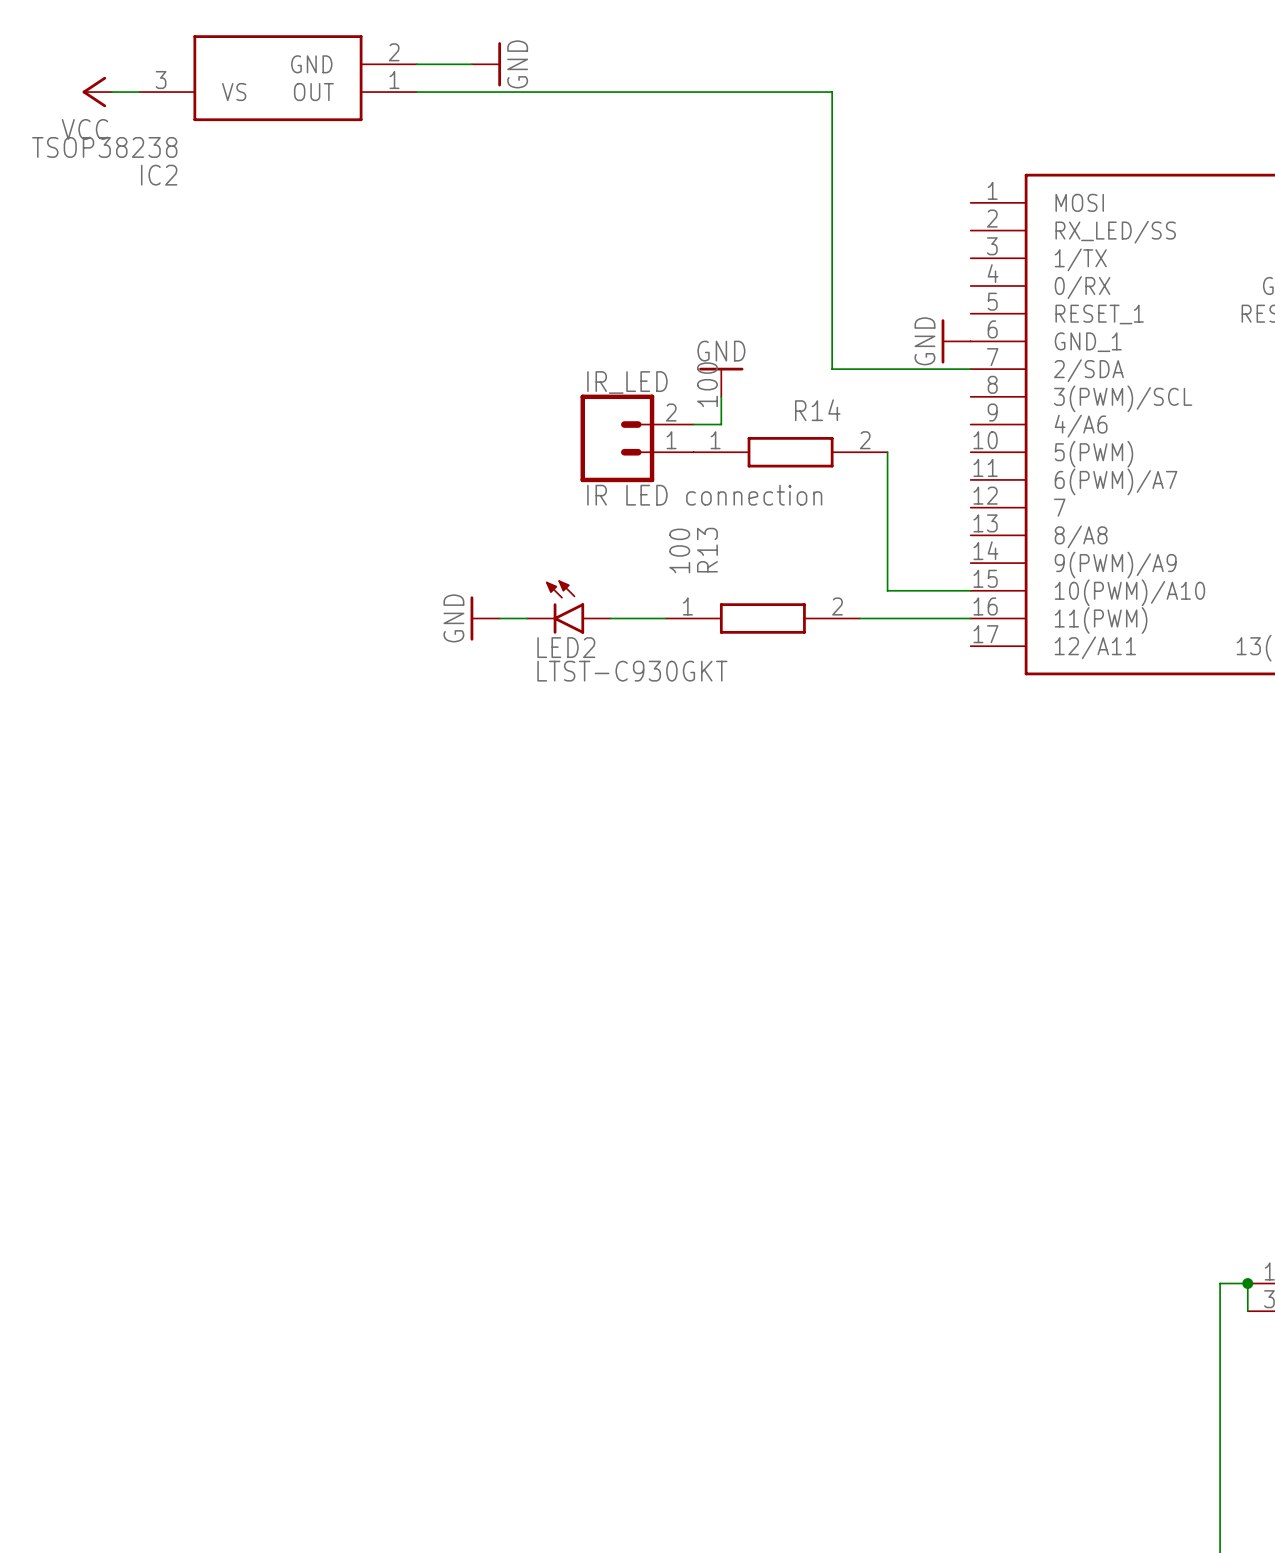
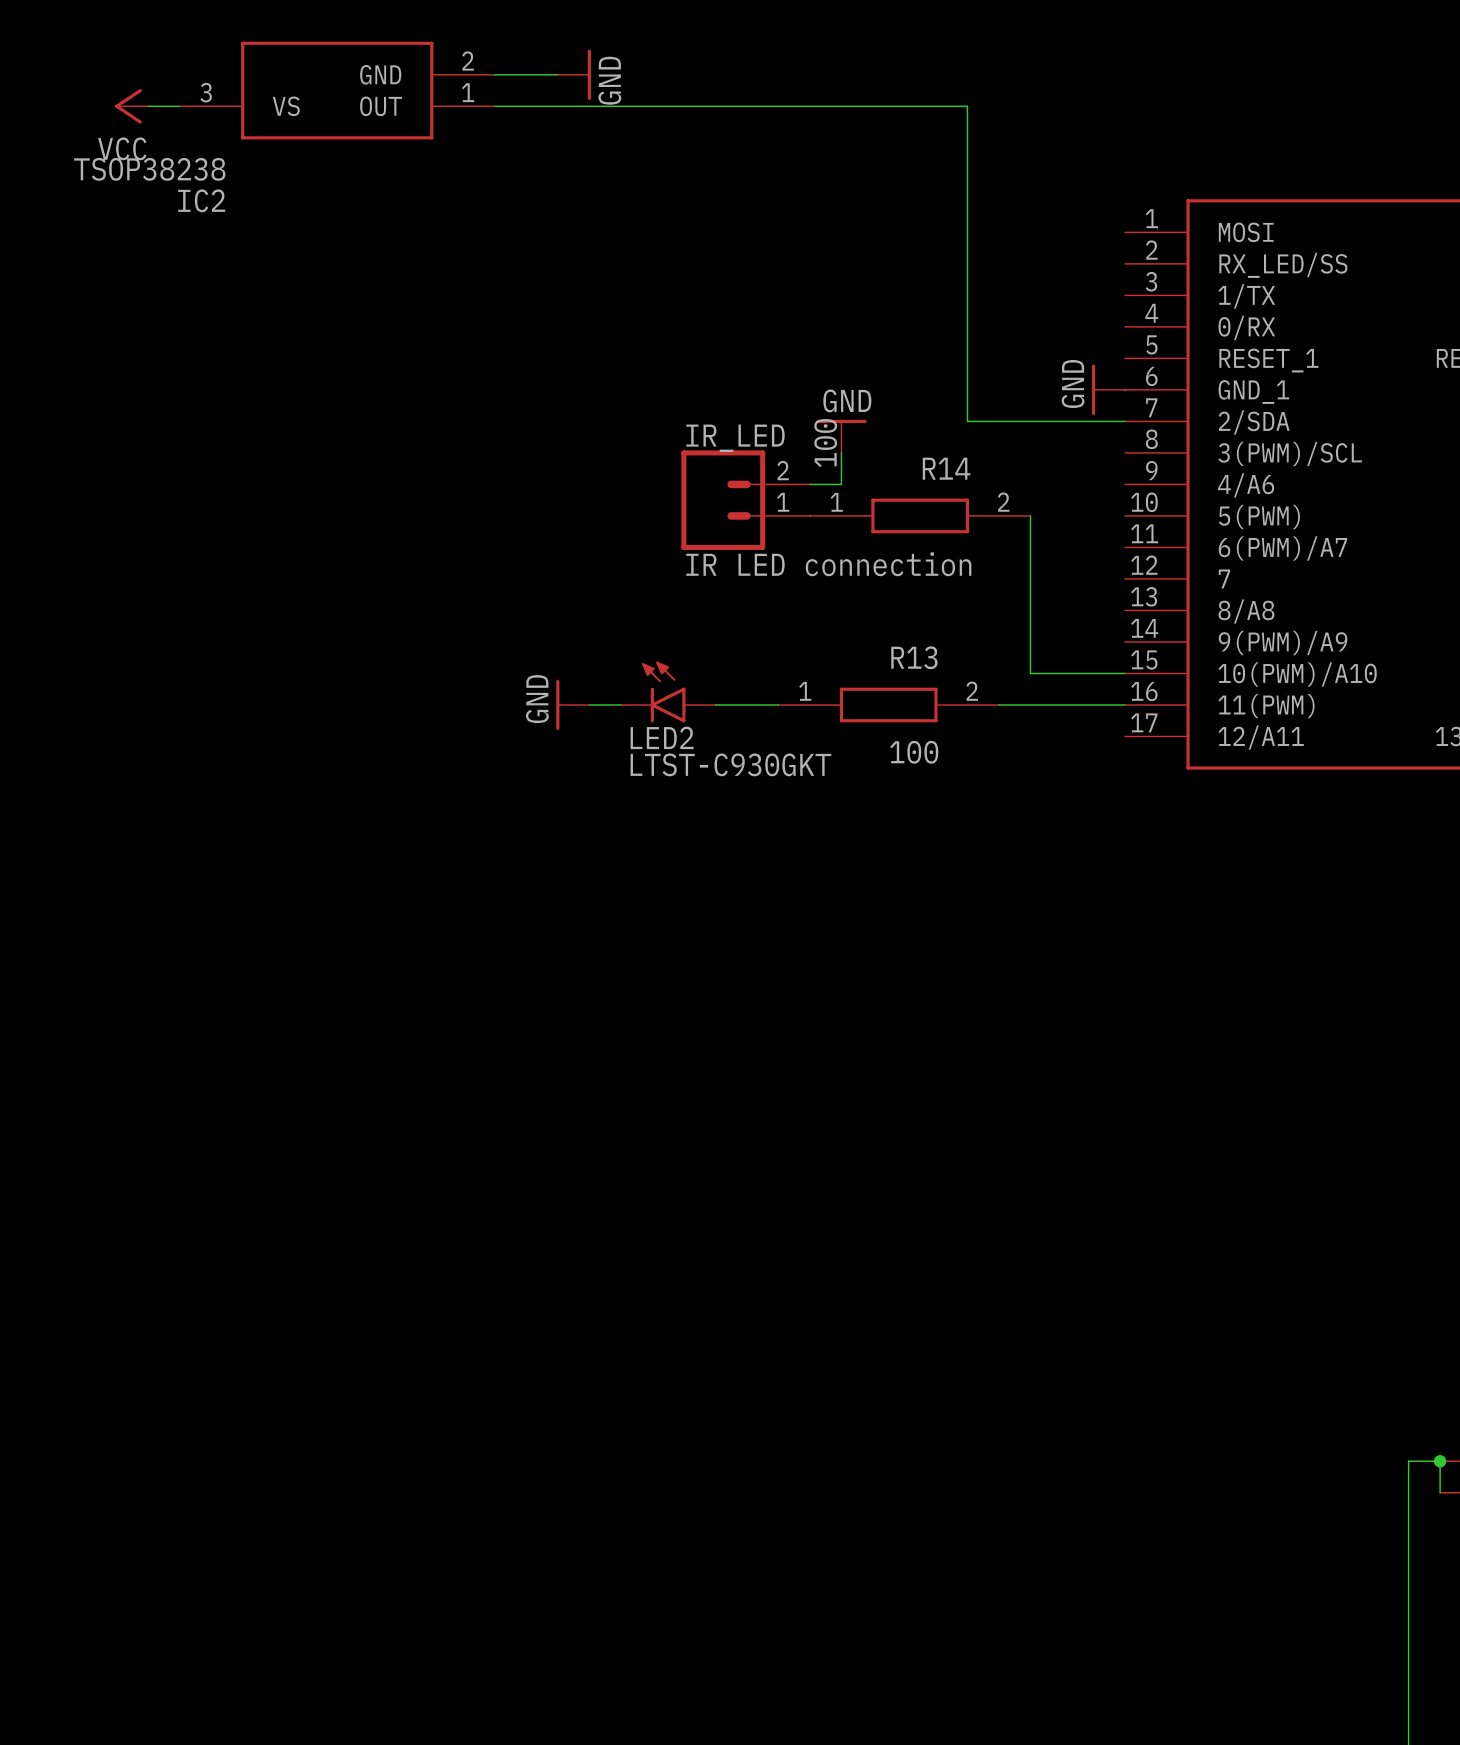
R13 value rotation: 0° (679, 550) -> 90° clockwise (914, 752)
R13 value position: 100 (679, 550) -> 100 (914, 752)
R13 name rotation: 0° (707, 550) -> 90° clockwise (914, 657)
R13 name position: R13 (707, 550) -> R13 (914, 657)

